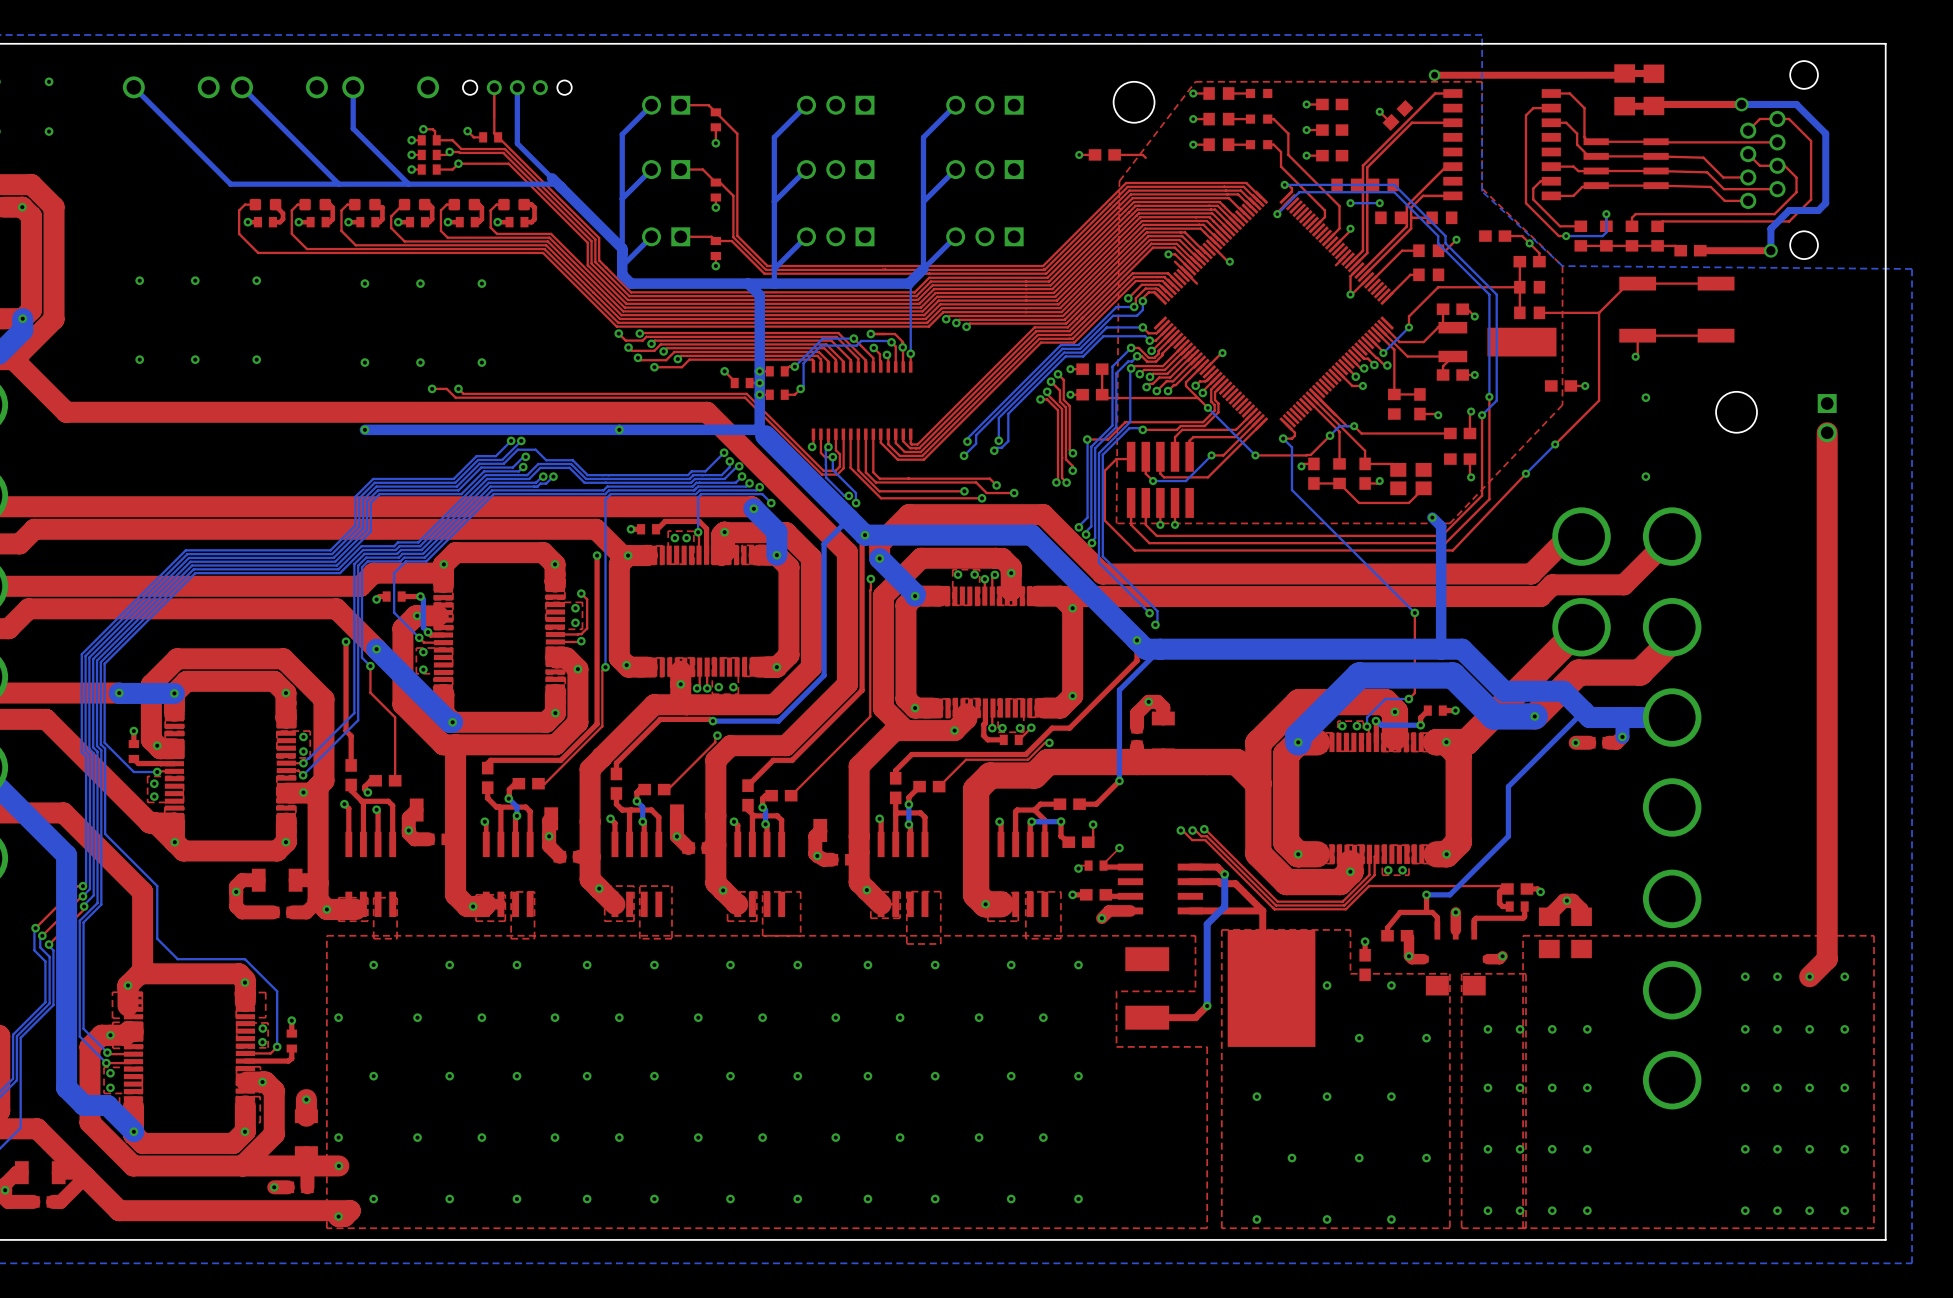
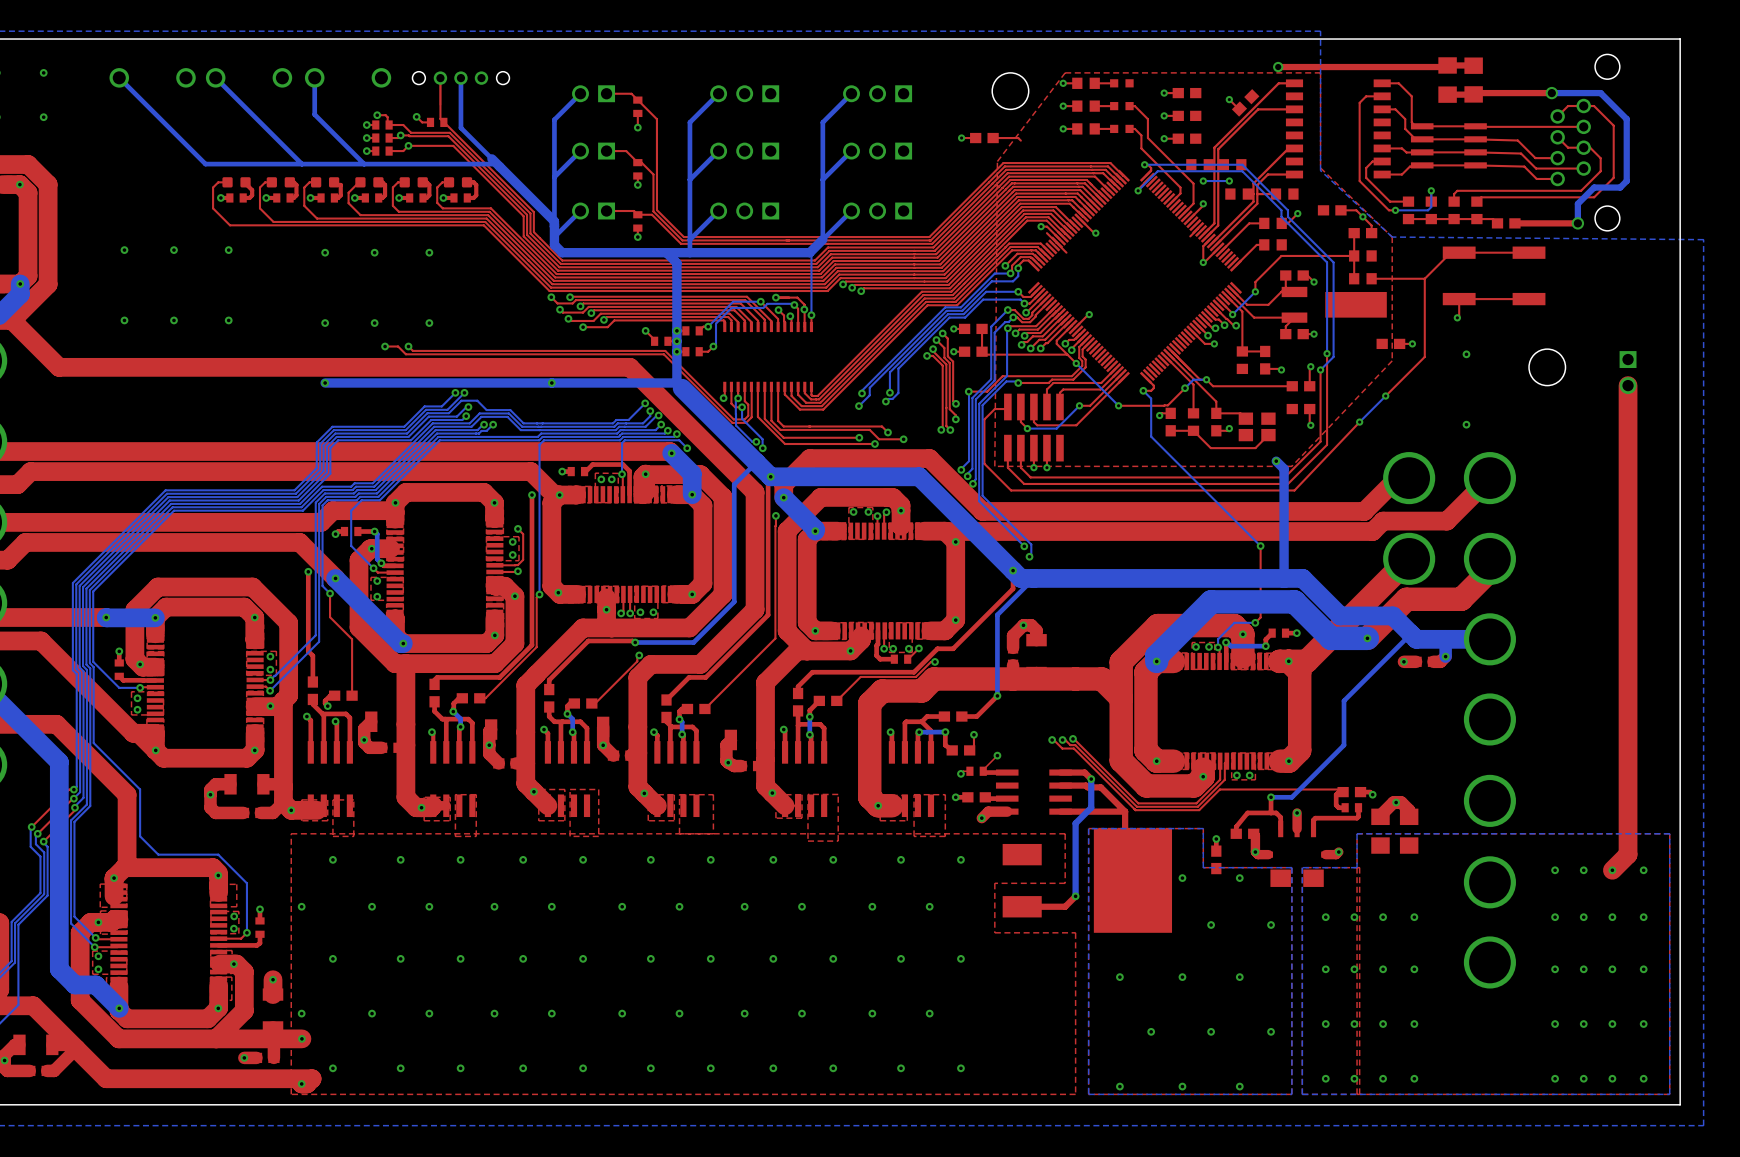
bottom zone outline: none -> (1203, 828) (1203, 867) (1291, 867) (1291, 1094) (1088, 1094) (1088, 828) (1203, 828)
bottom zone outline: none -> (1669, 833) (1357, 833) (1357, 867) (1302, 867) (1302, 1094) (1669, 1094) (1669, 833)

